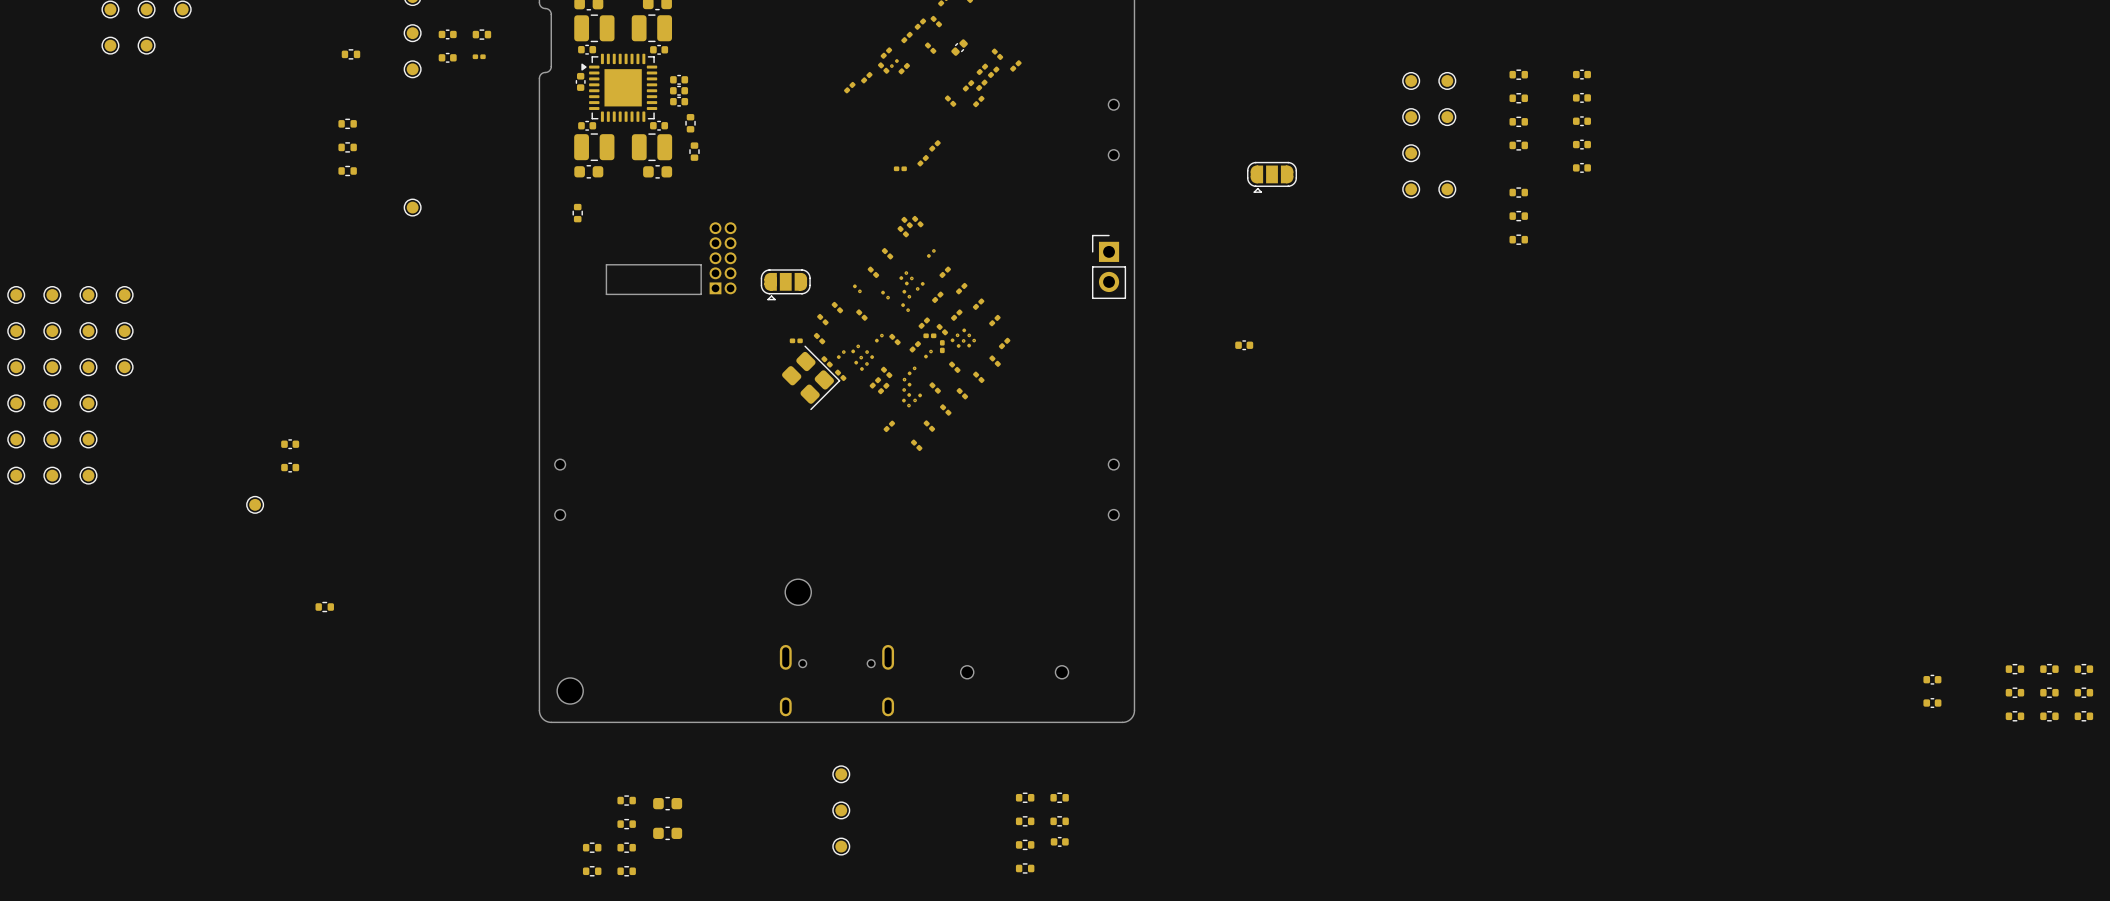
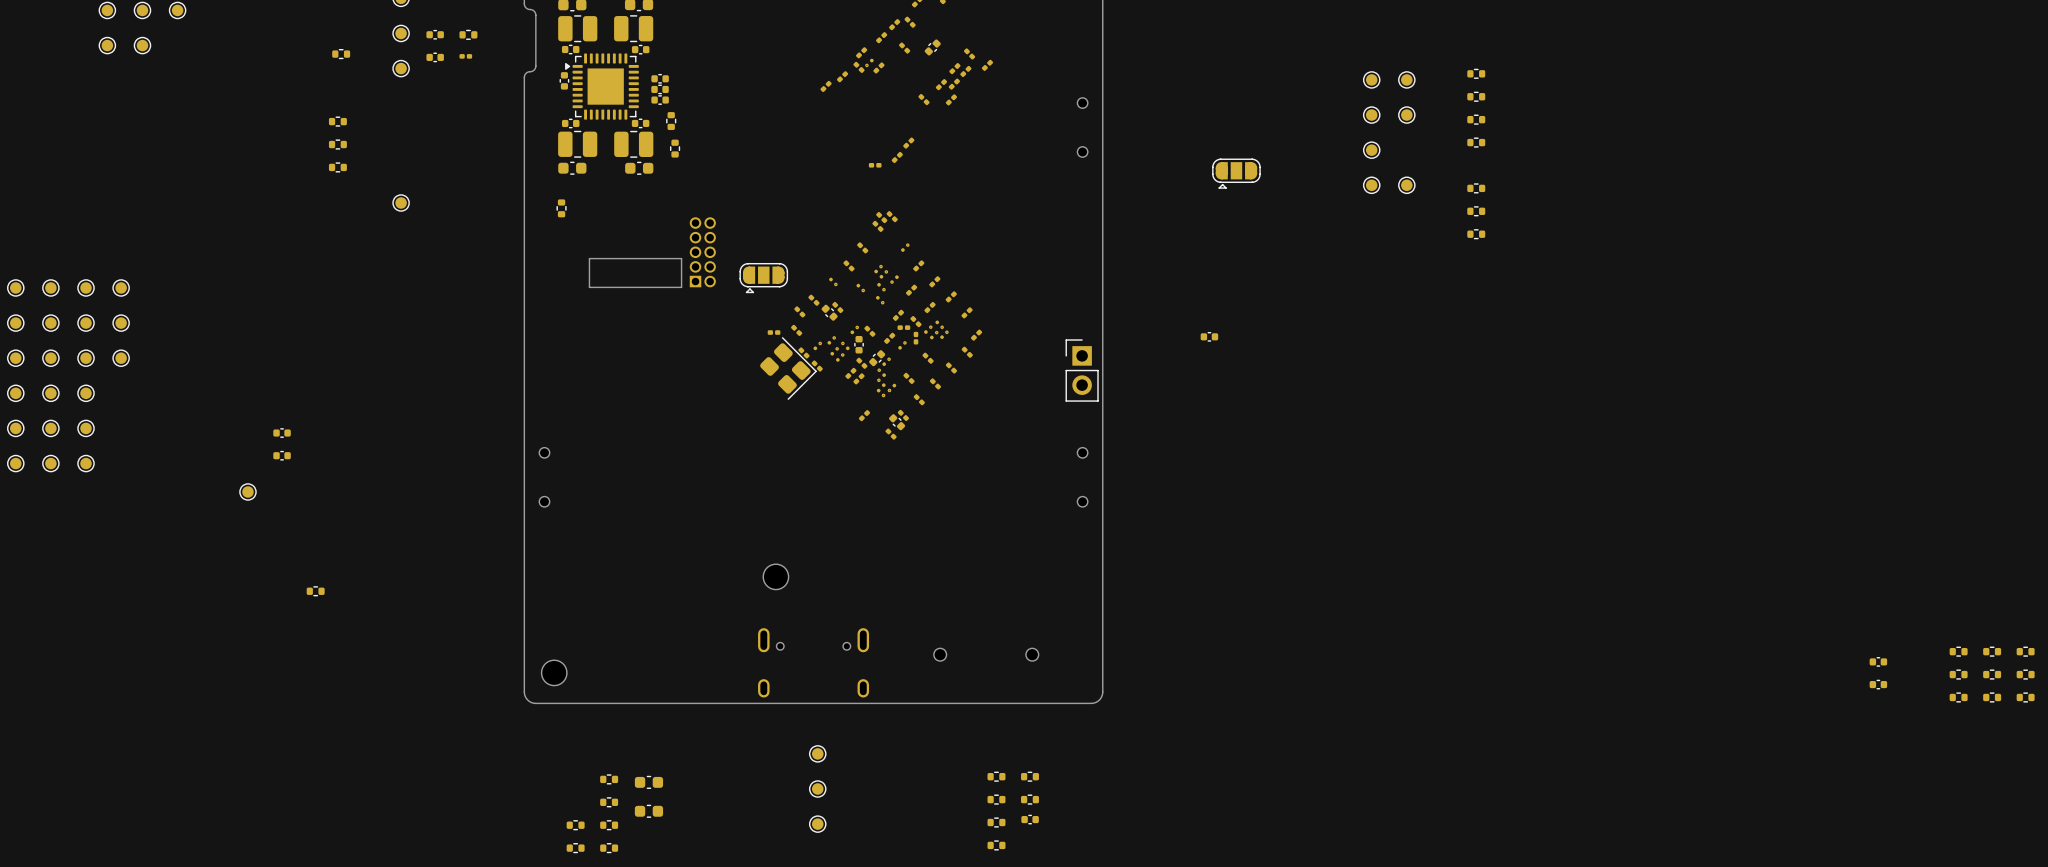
part: (1581, 74) -> none
part: (1581, 97) -> none
part: (1581, 121) -> none
part: (1581, 144) -> none
part: (1581, 167) -> none
part position: (1109, 266) -> (1082, 370)
part: none -> (829, 312)
part: none -> (859, 344)
part: none -> (877, 358)
part: none -> (897, 422)

